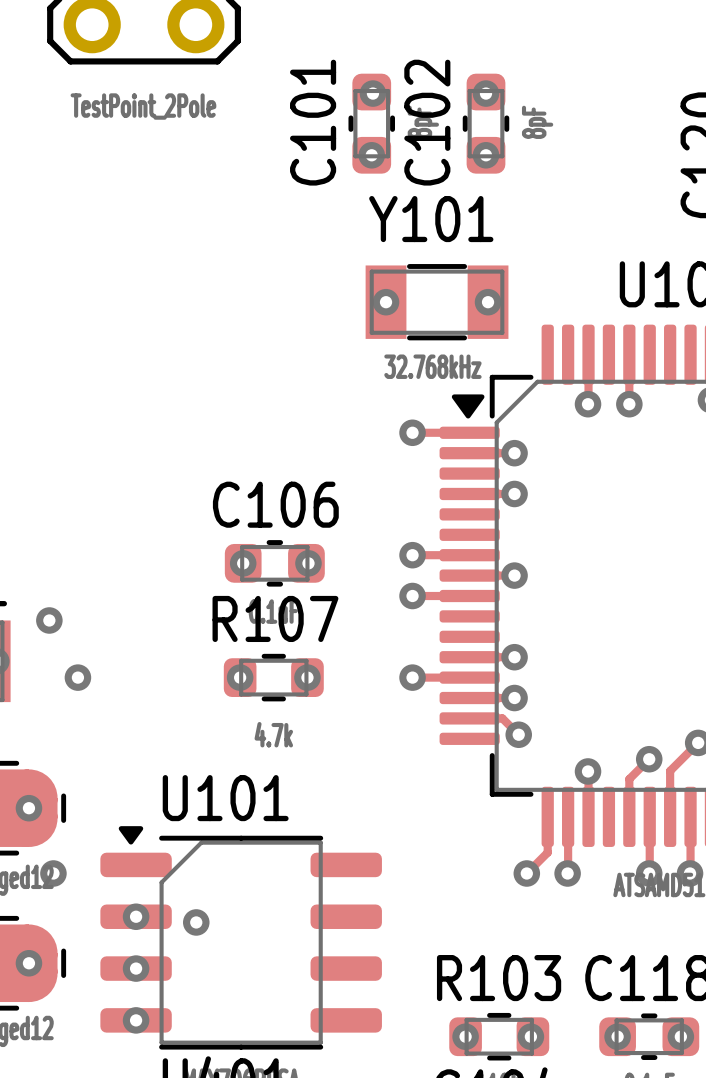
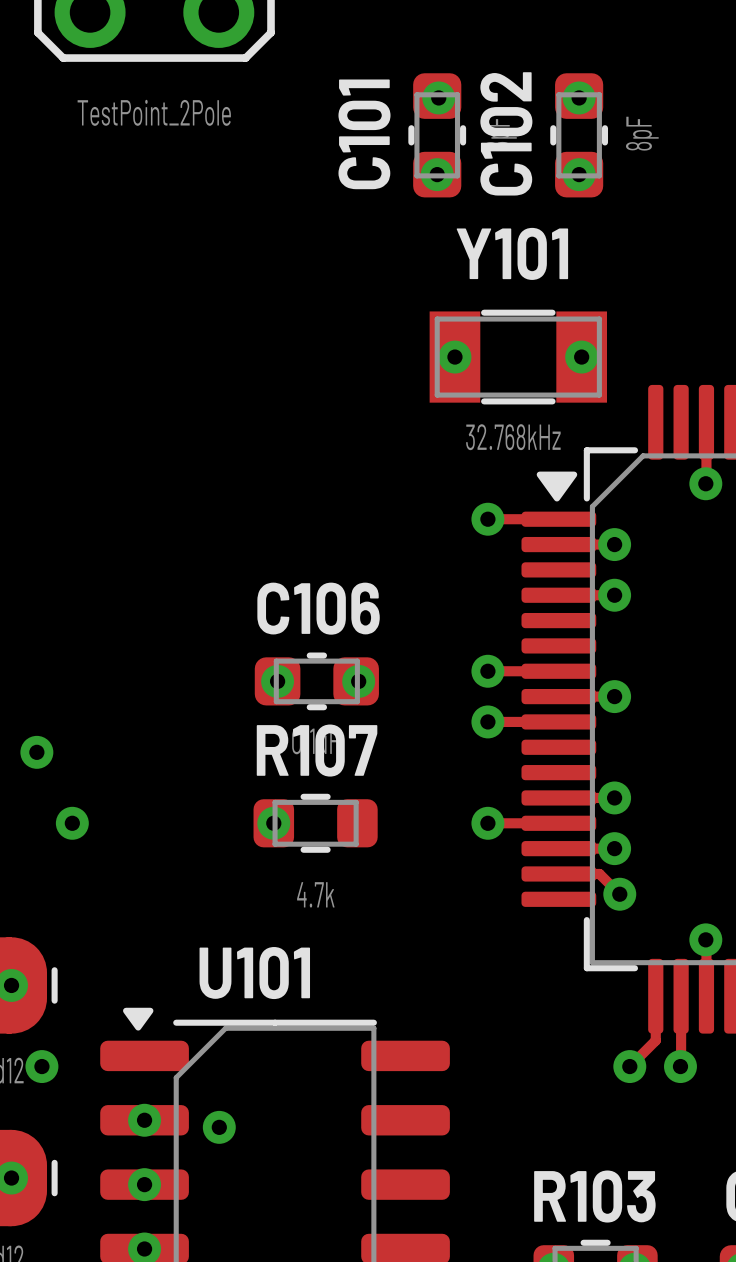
via: (307, 677) -> none

